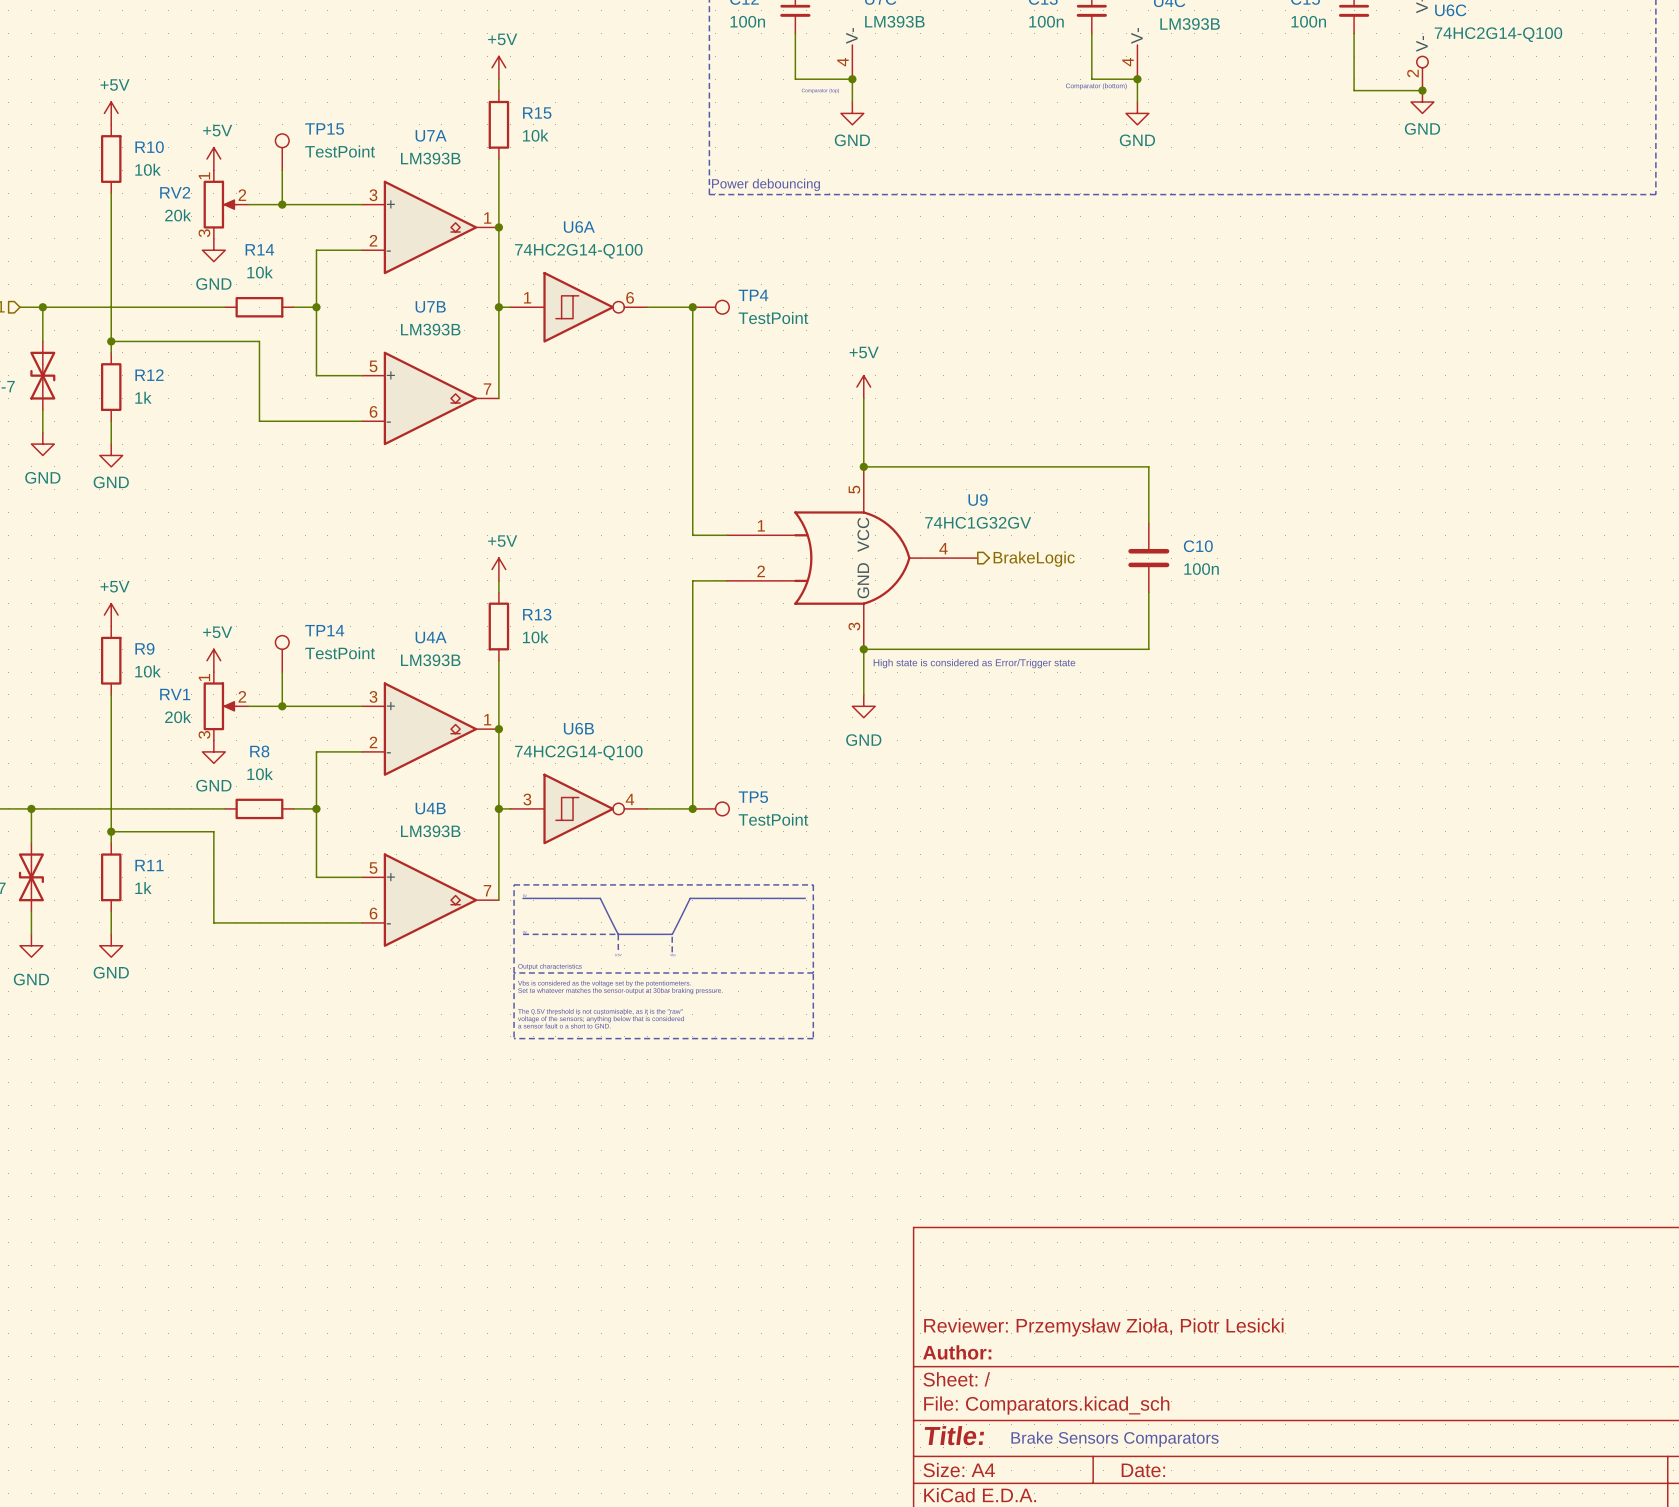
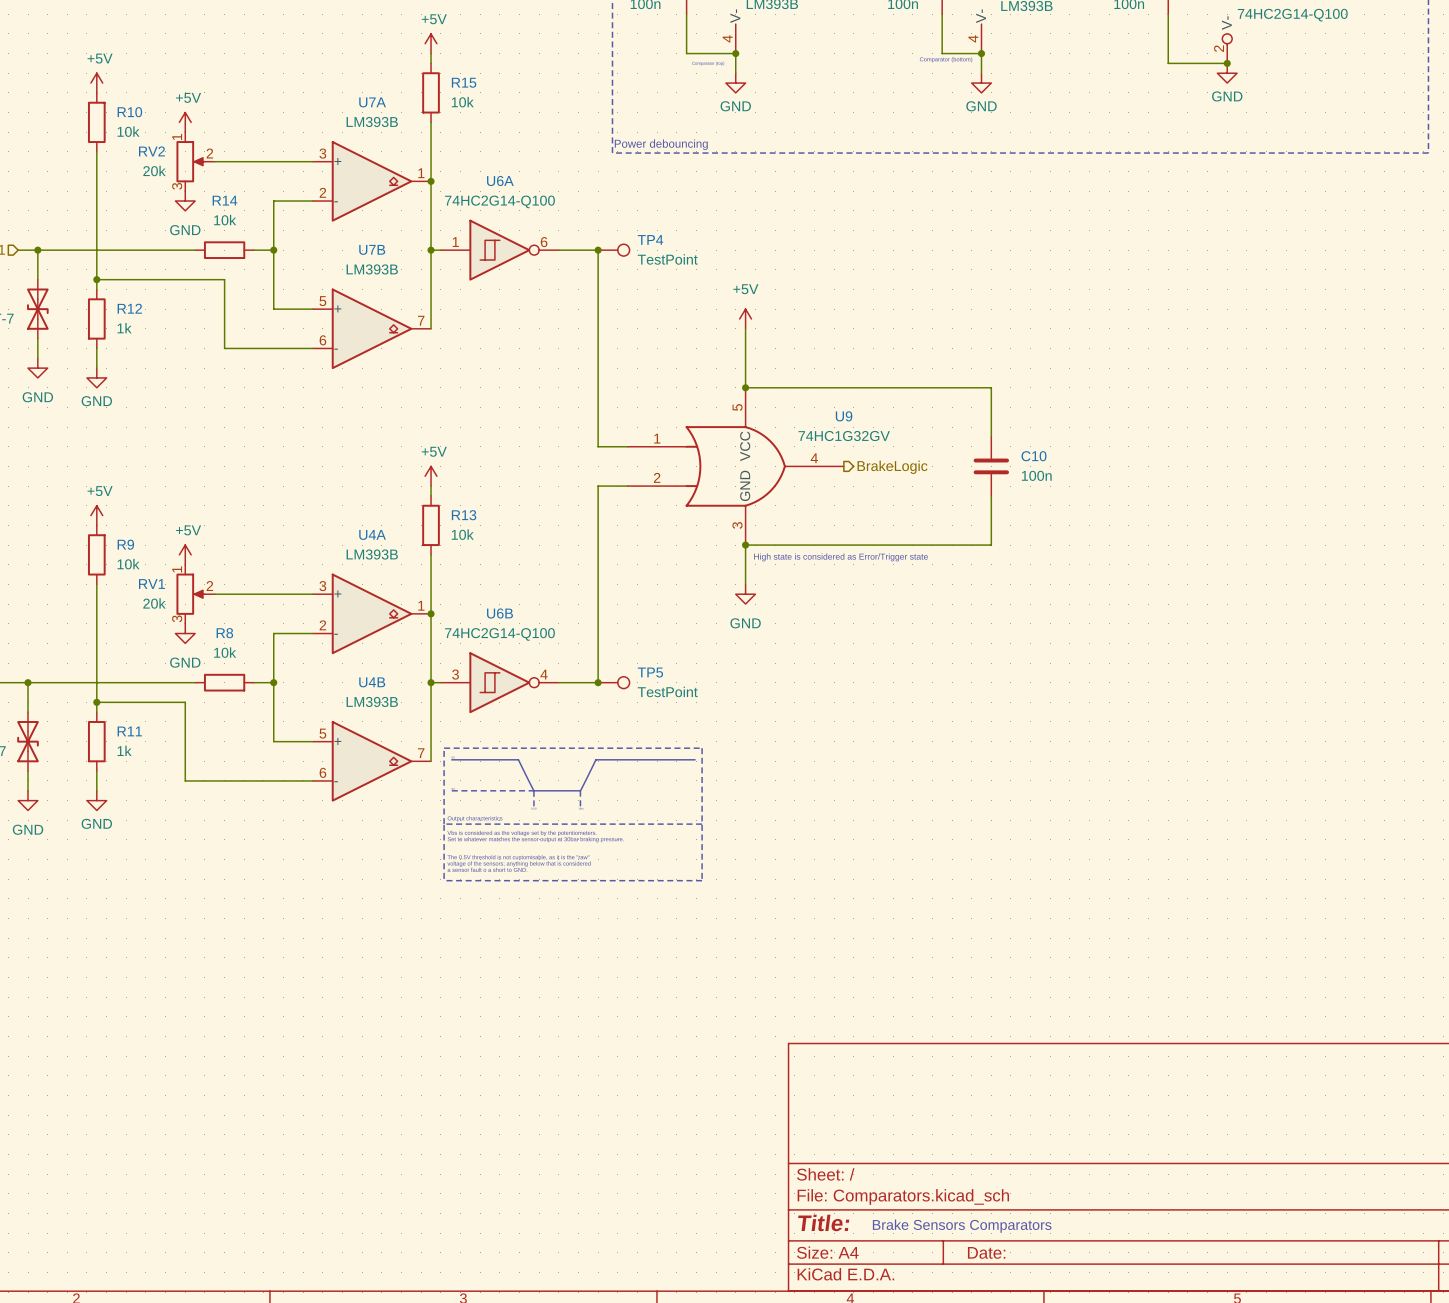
TP15: TestPoint (282, 152) -> none
wire: (282, 170) (282, 204) -> none
junction: (282, 204) -> none
TP14: TestPoint (282, 653) -> none
wire: (282, 672) (282, 706) -> none
junction: (282, 706) -> none
title block: Reviewer: Przemysław Zioła, Piotr Lesicki (1103, 1327) -> none
title block: Author: (957, 1352) -> none

